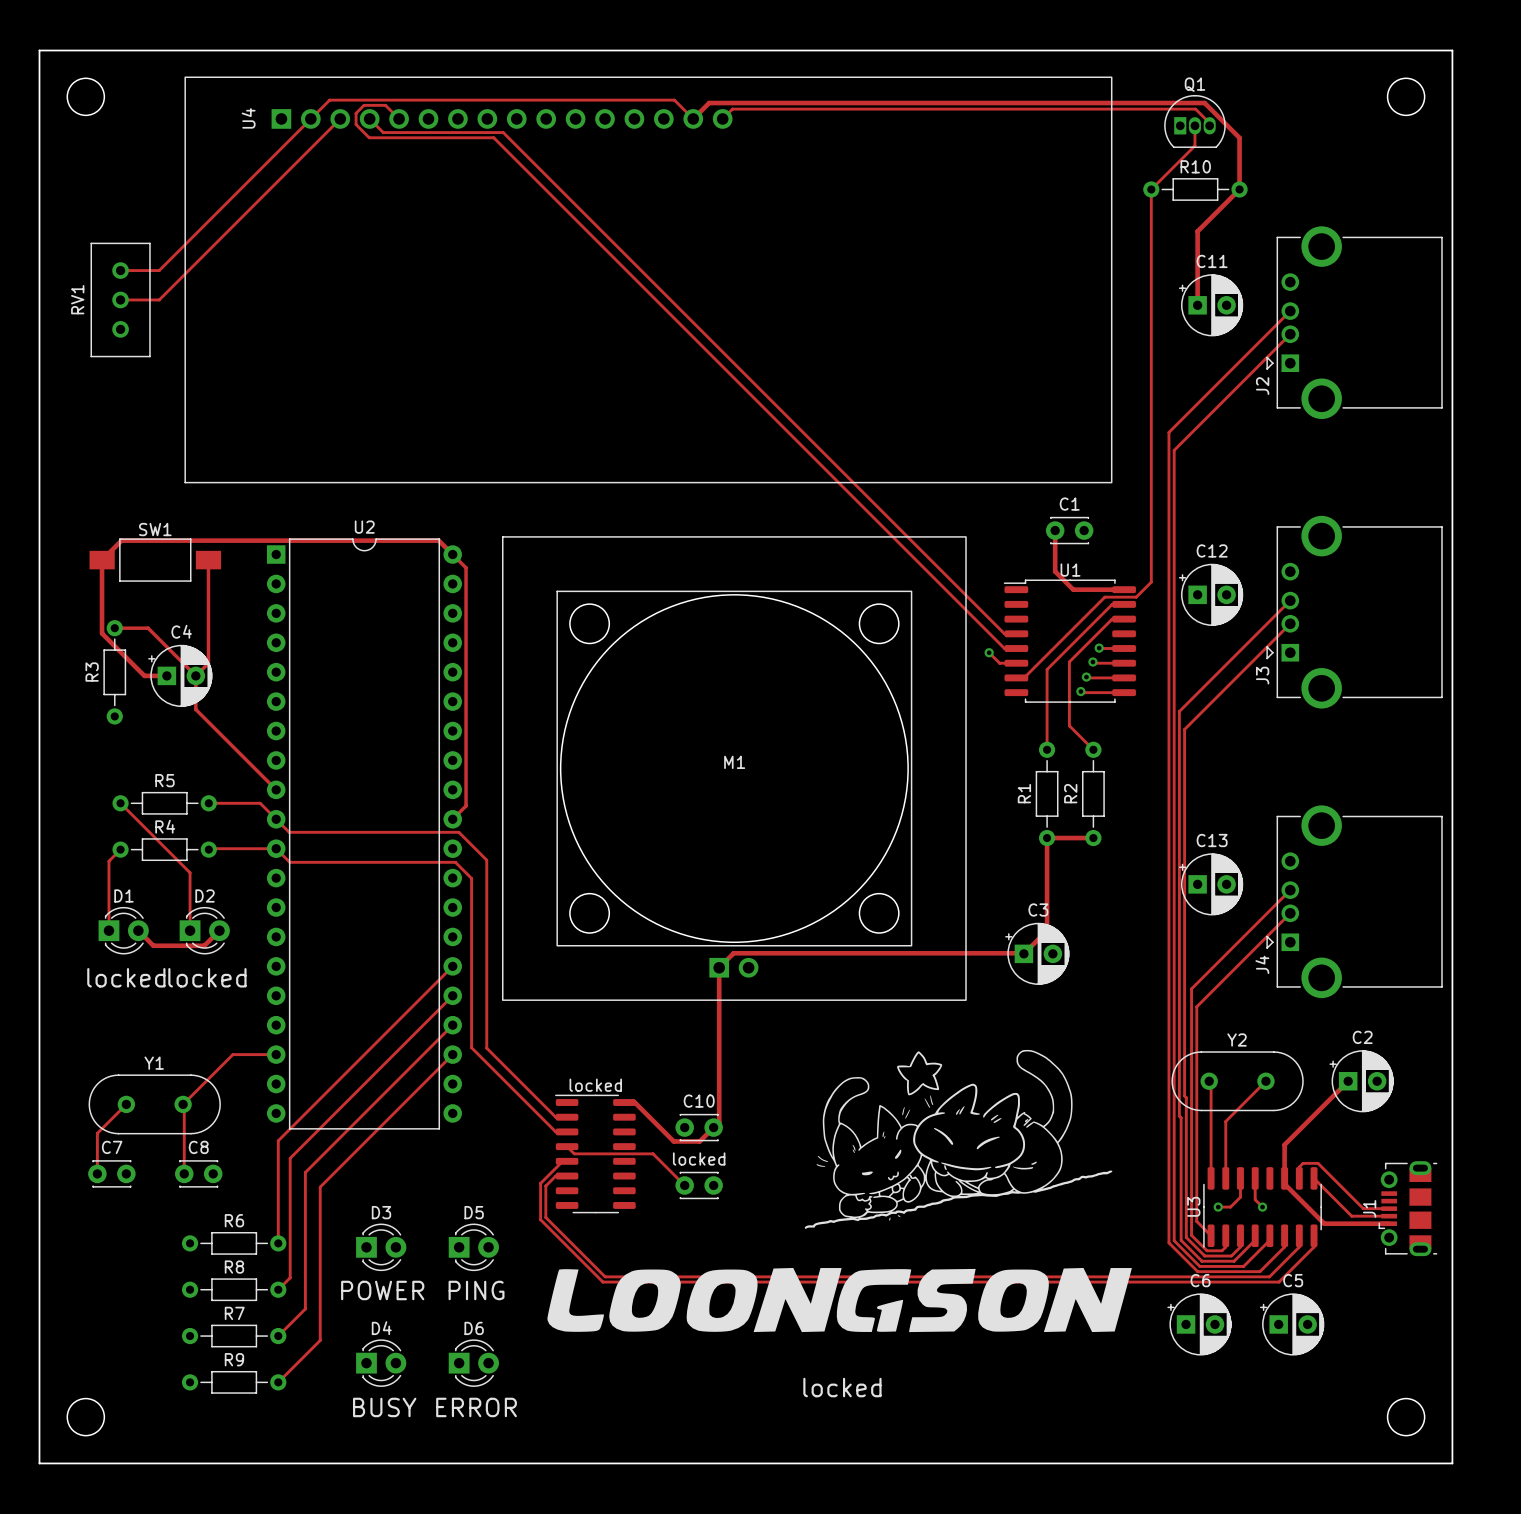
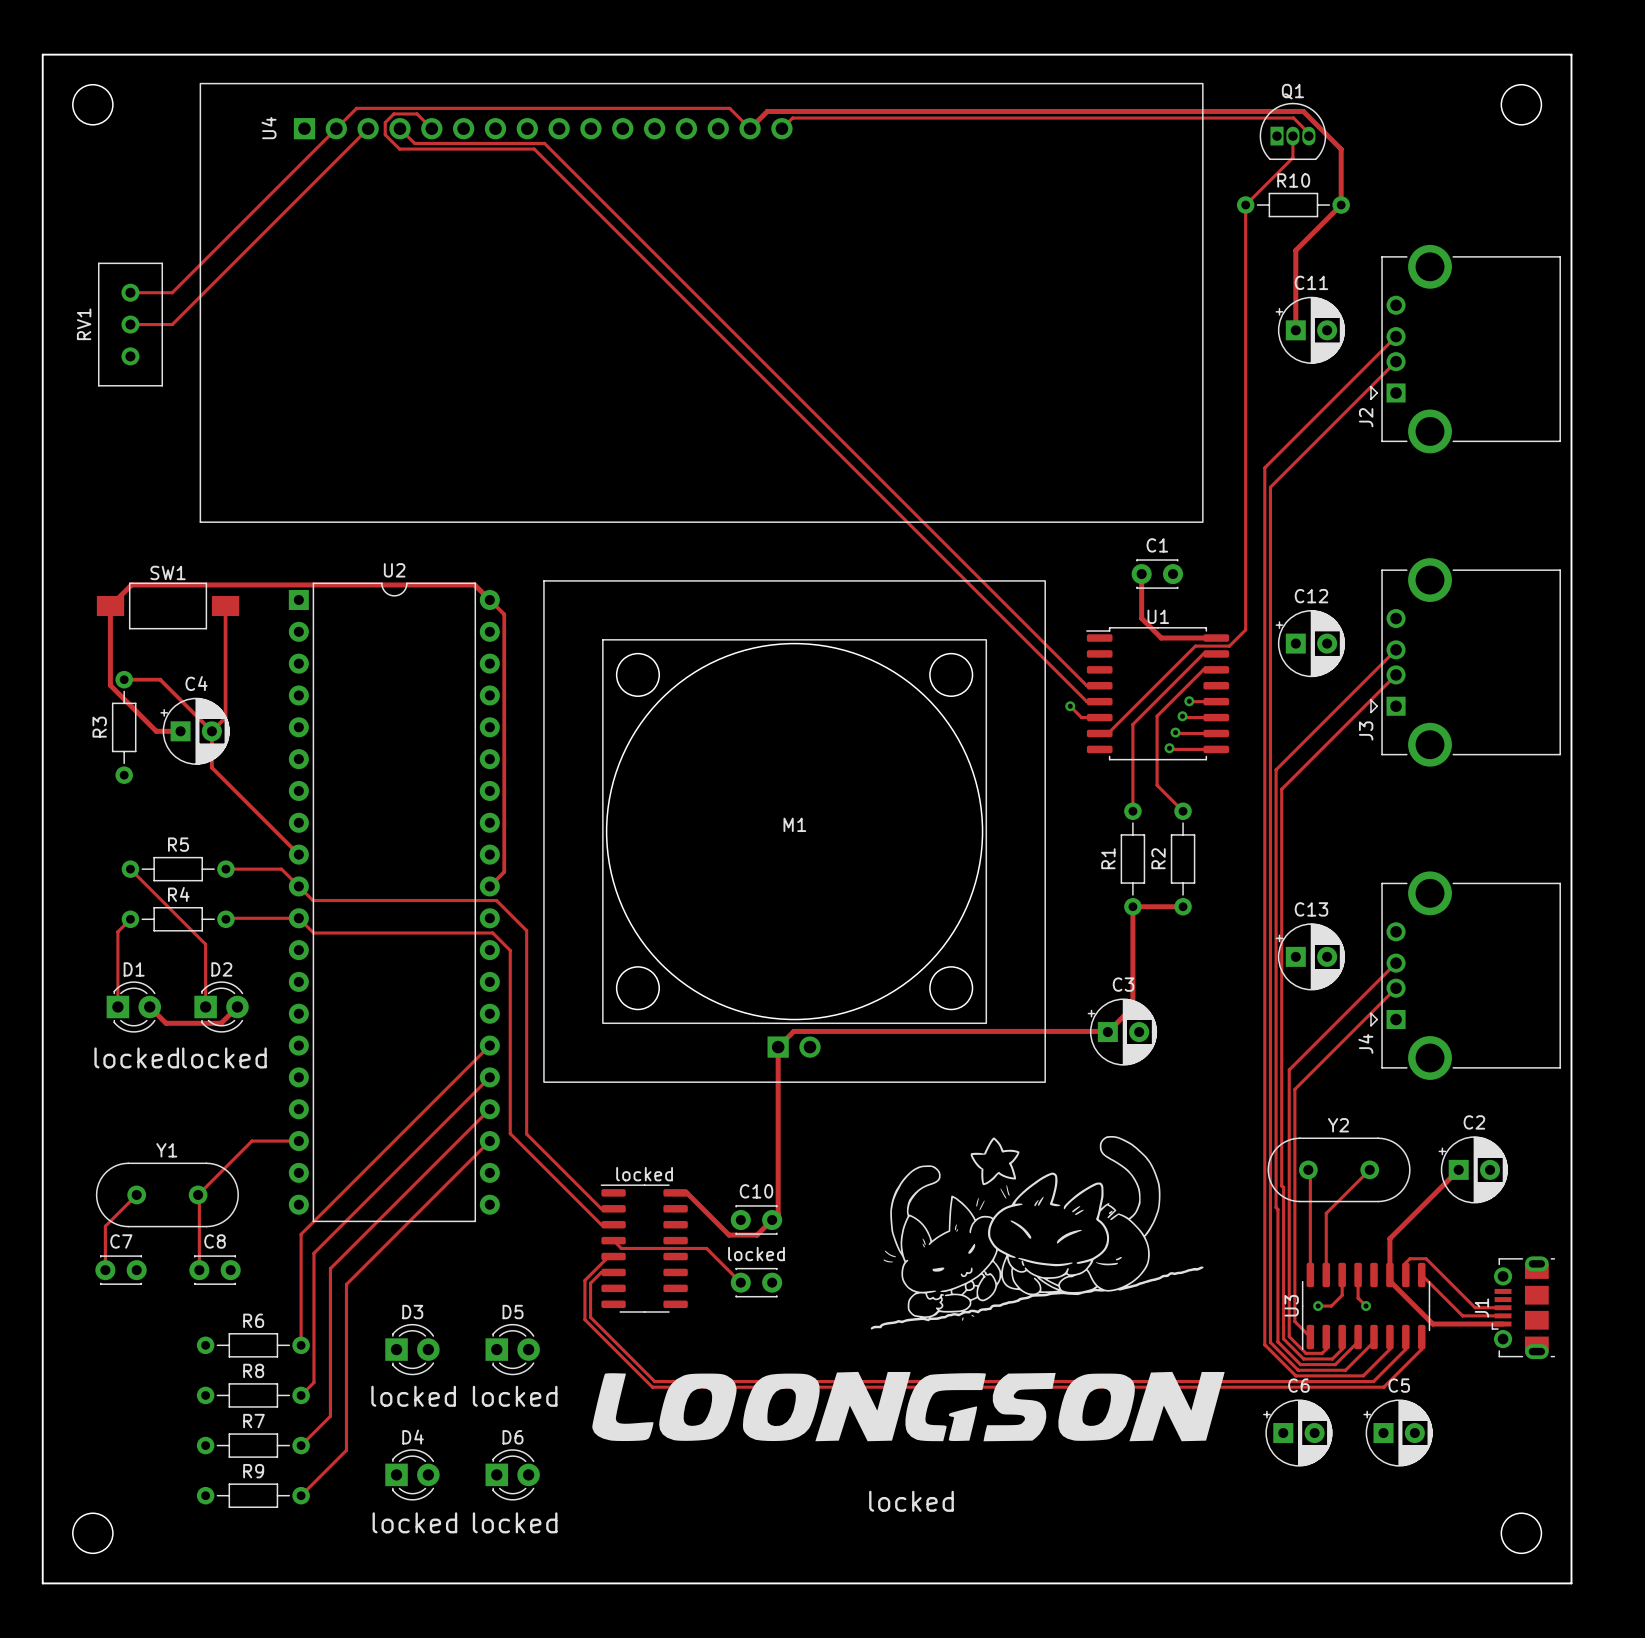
text: POWER (382, 1290) -> locked (413, 1396)
text: PING (476, 1290) -> locked (515, 1396)
text: BUSY (384, 1407) -> locked (414, 1522)
text: ERROR (476, 1407) -> locked (515, 1522)

